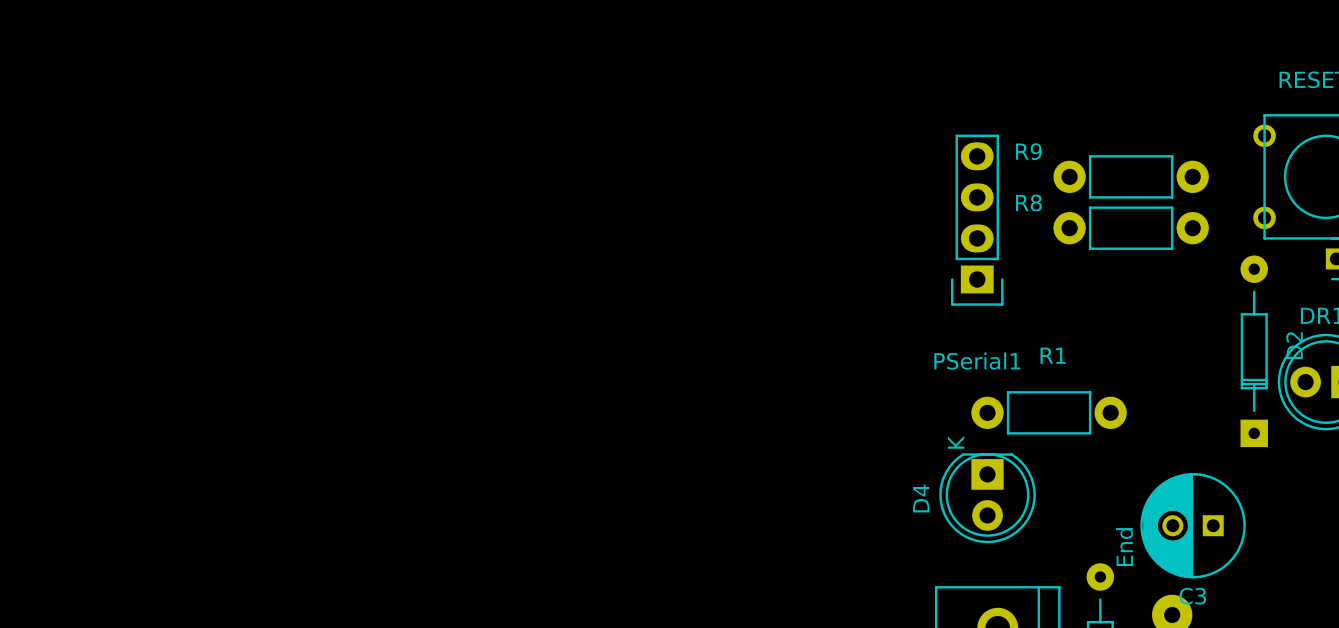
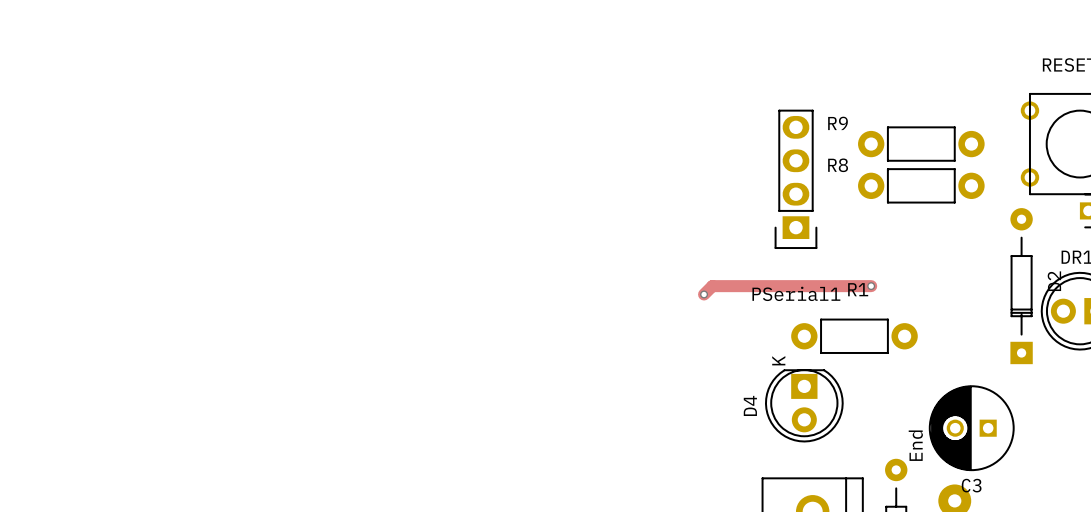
track: none -> (871, 286) (712, 286) (704, 294)
via: none -> (871, 286)
via: none -> (704, 294)

